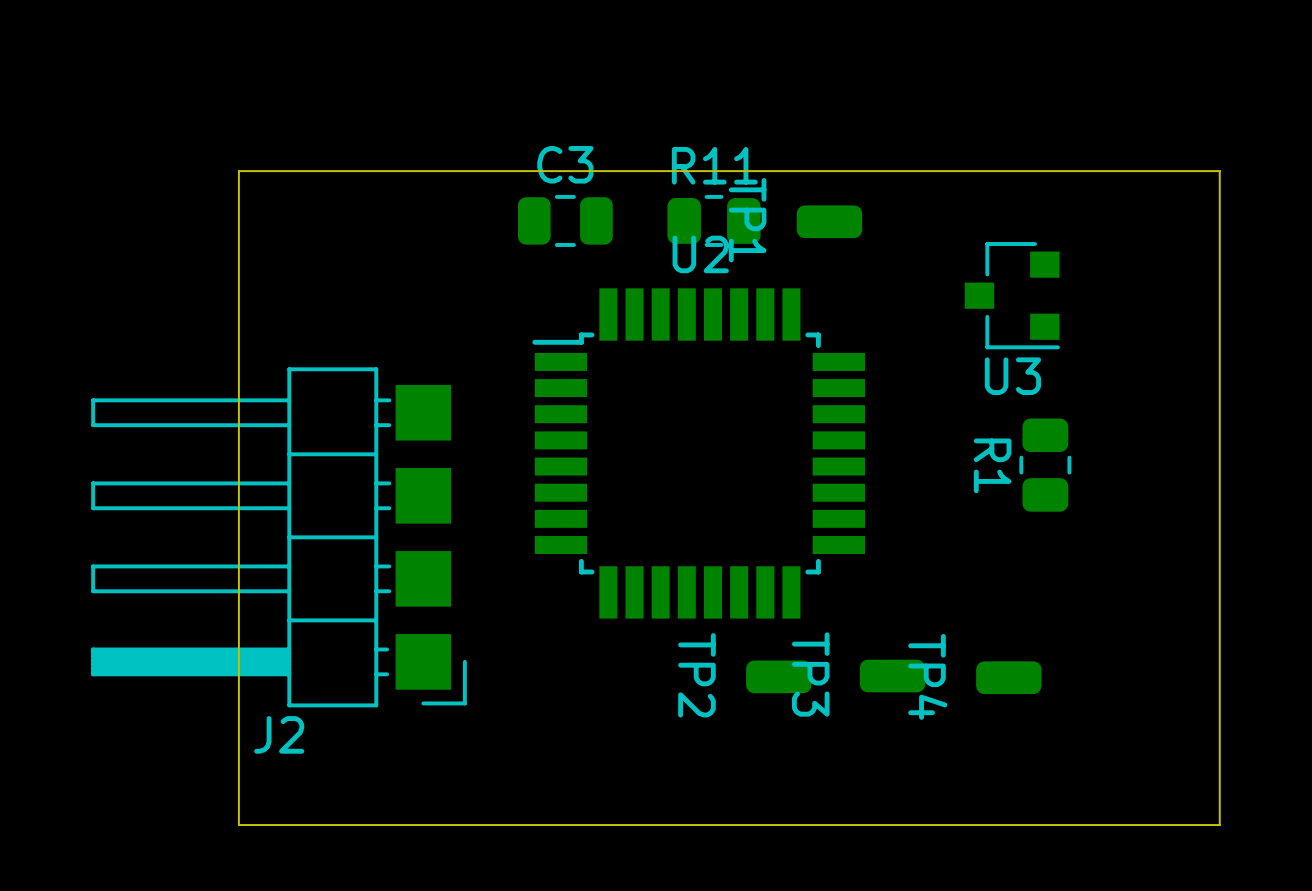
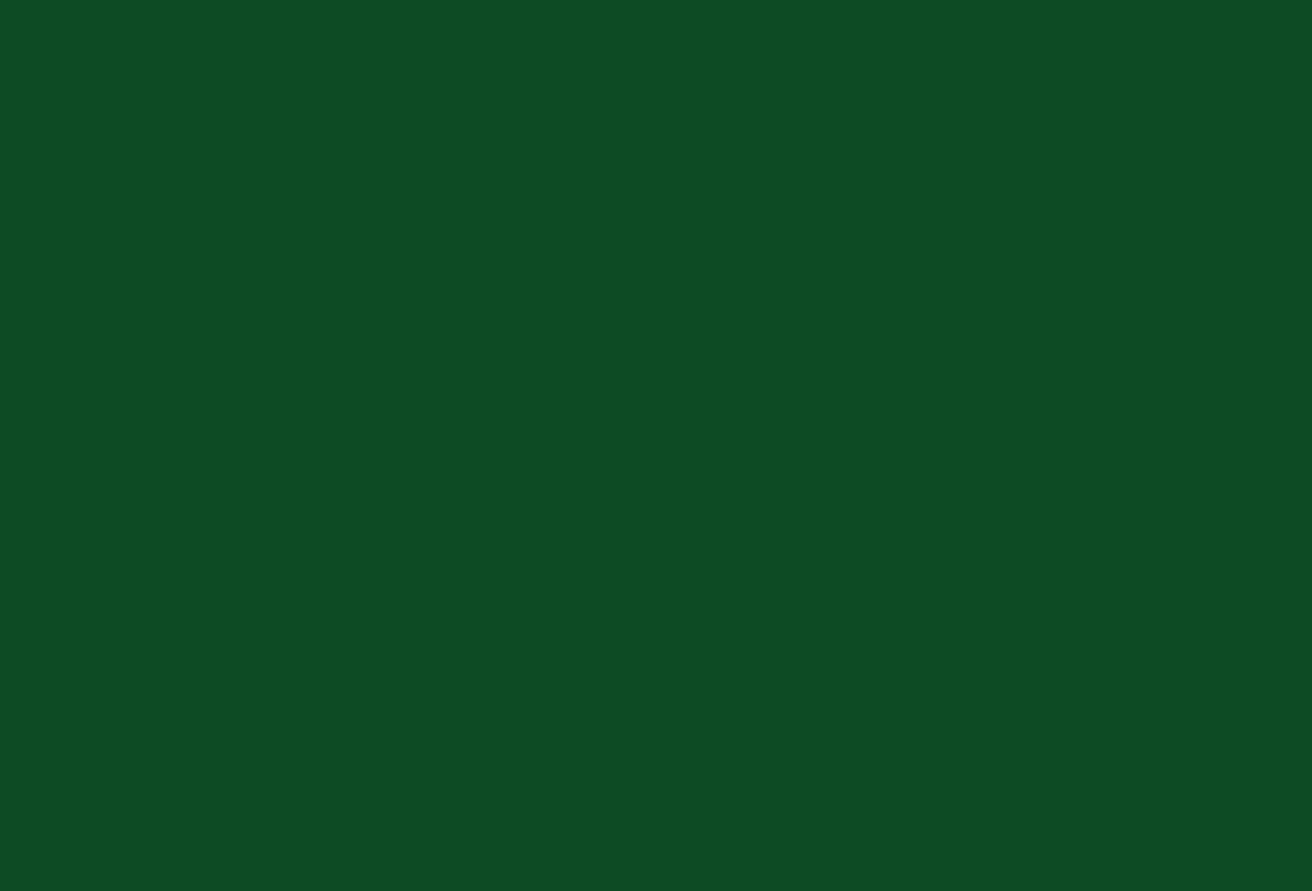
board edge: (1219, 171) (1219, 825) (238, 825) (238, 171) (1219, 171) -> none
C3: (565, 220) -> none
R11: (714, 220) -> none
TP1: (829, 221) -> none
U3: (1012, 295) -> none
U2: (698, 453) -> none
R1: (1045, 465) -> none
J2: (279, 537) -> none
TP2: (778, 676) -> none
TP3: (892, 676) -> none
TP4: (1008, 677) -> none

